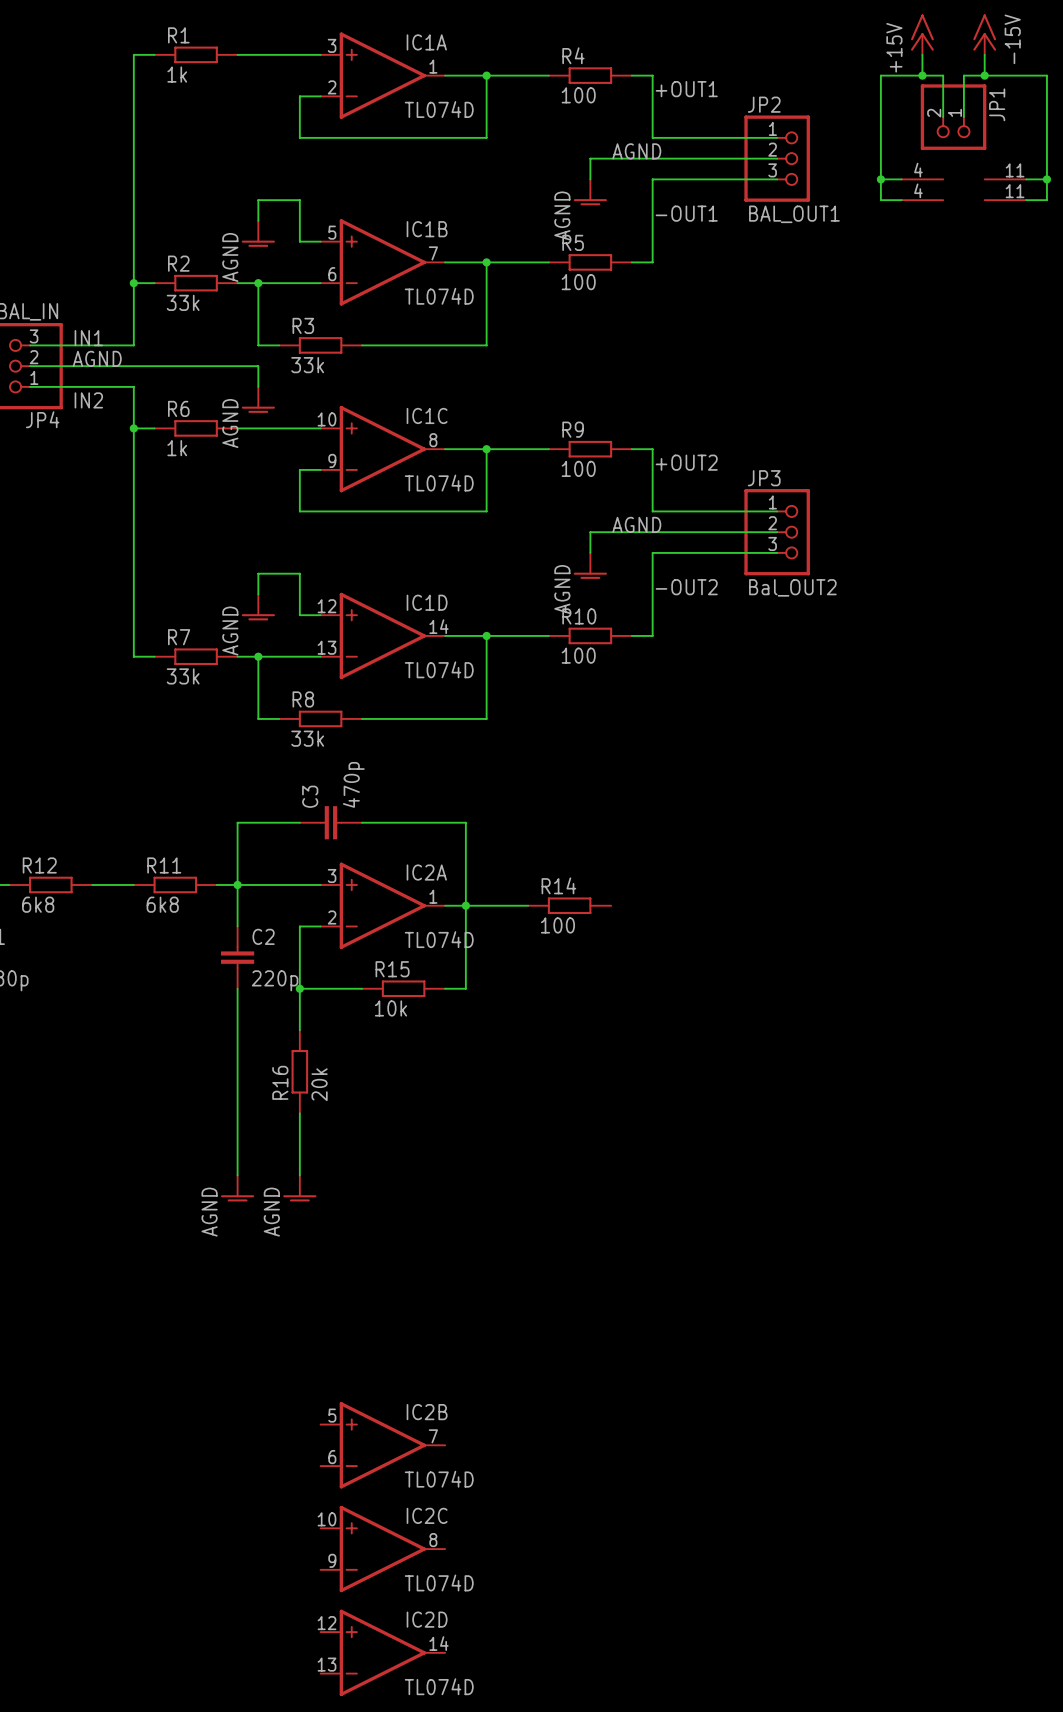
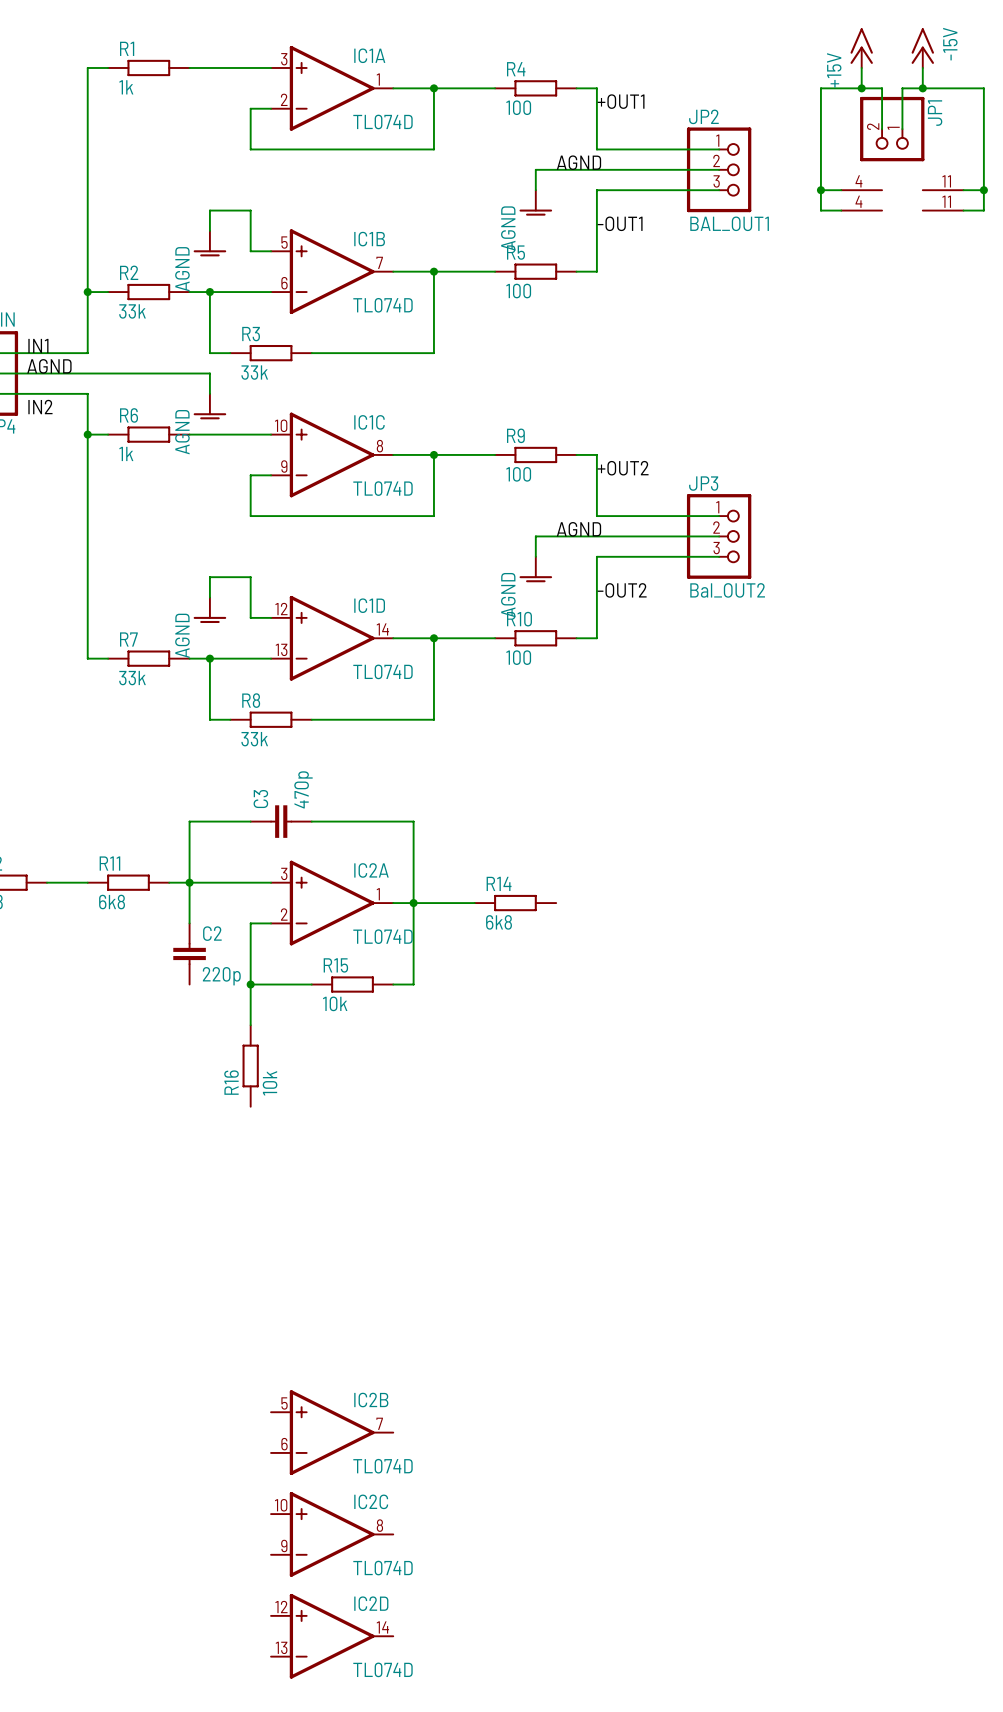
R14 value: 100 (557, 925) -> 6k8 (499, 922)
wire: (237, 988) (237, 1175) -> none
R16 value: 20k (319, 1084) -> 10k (270, 1083)
wire: (299, 1113) (299, 1175) -> none
power symbol: AGND (237, 1188) -> none
power symbol: AGND (299, 1188) -> none

